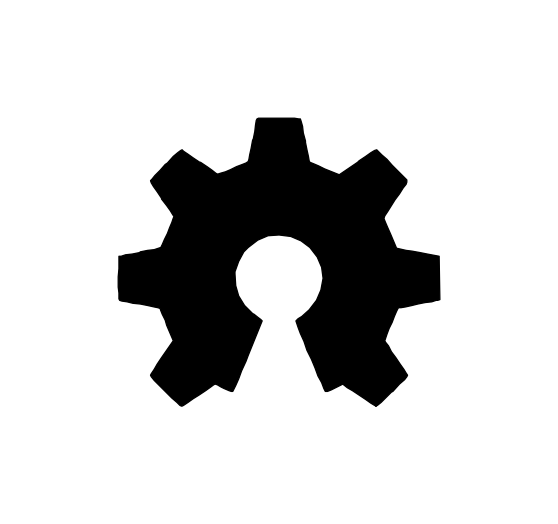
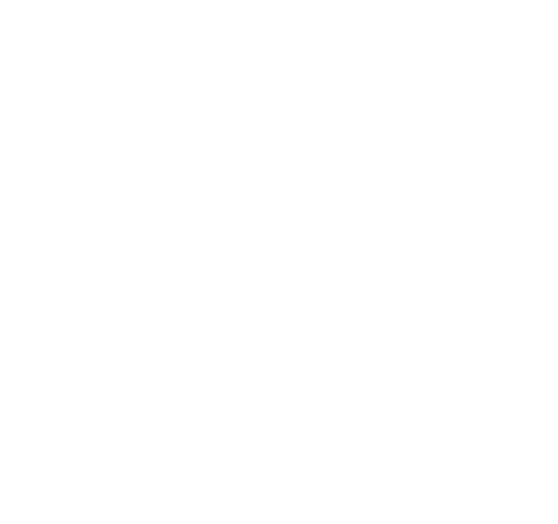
power symbol: (279, 262) -> none

